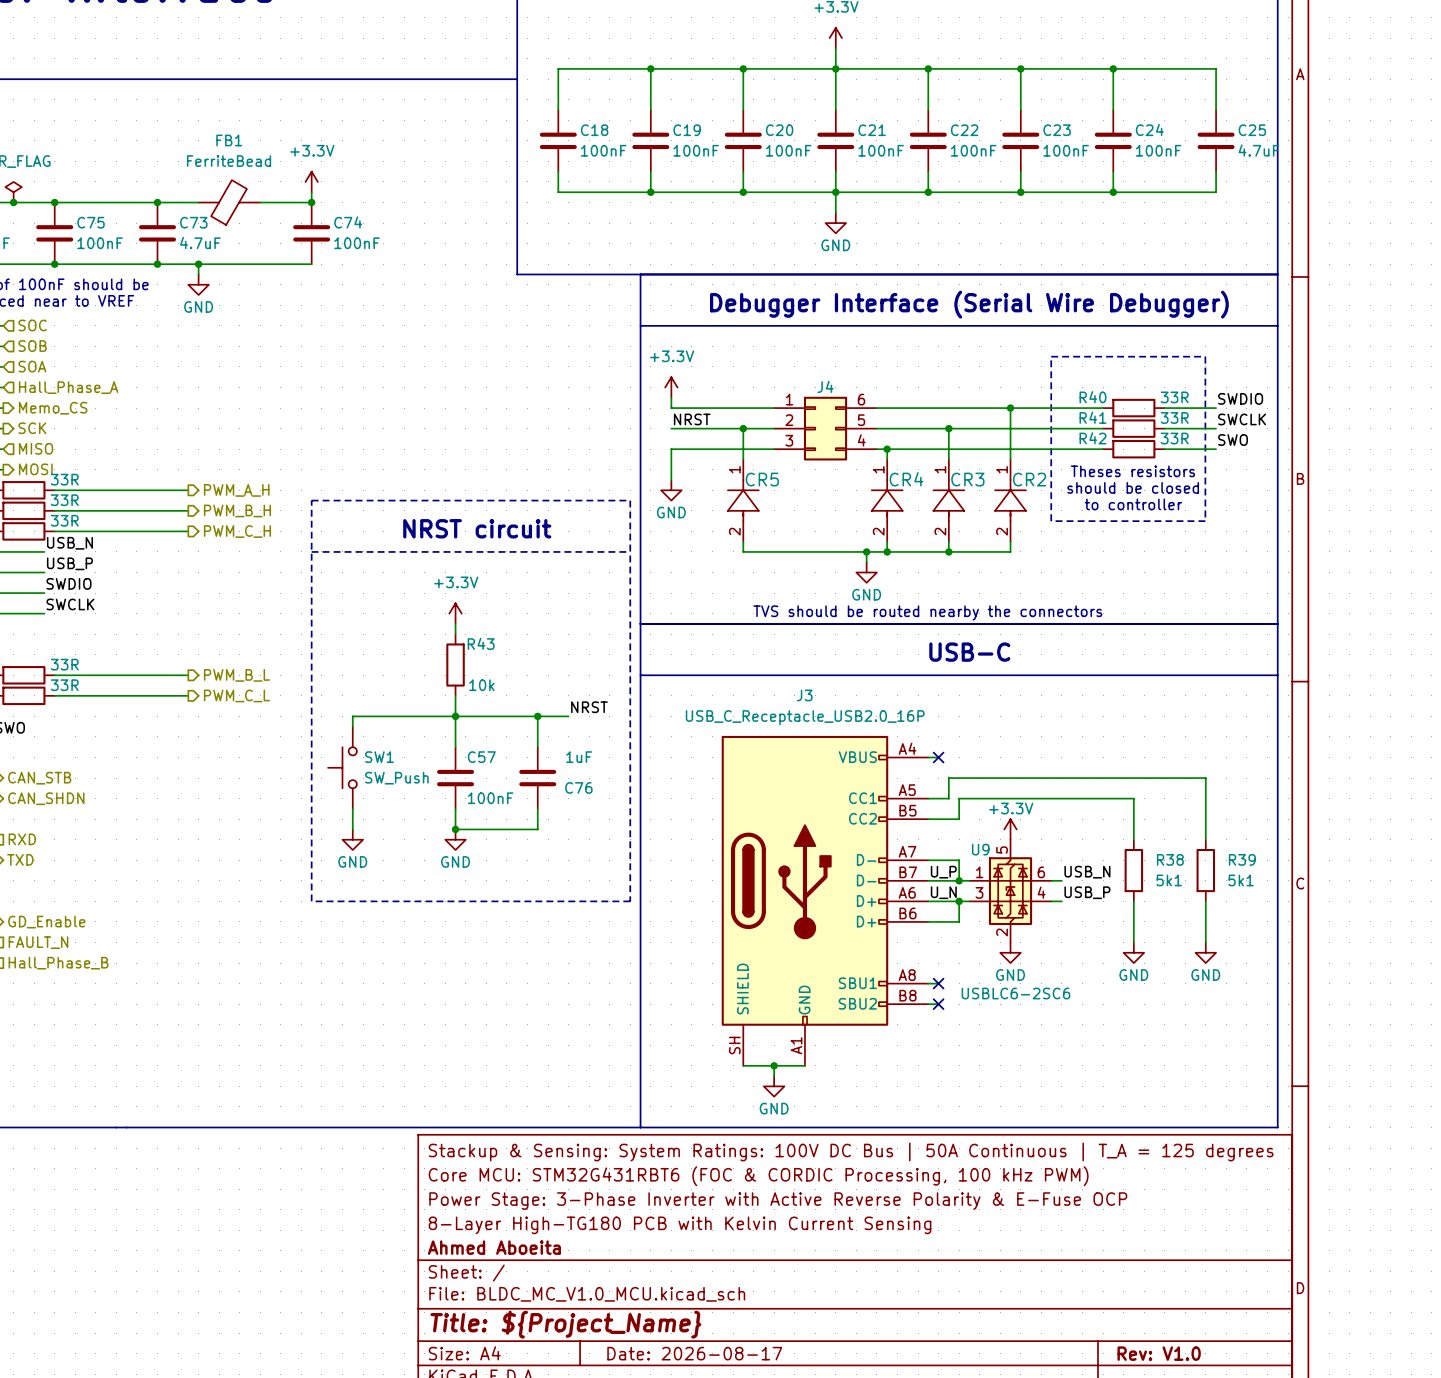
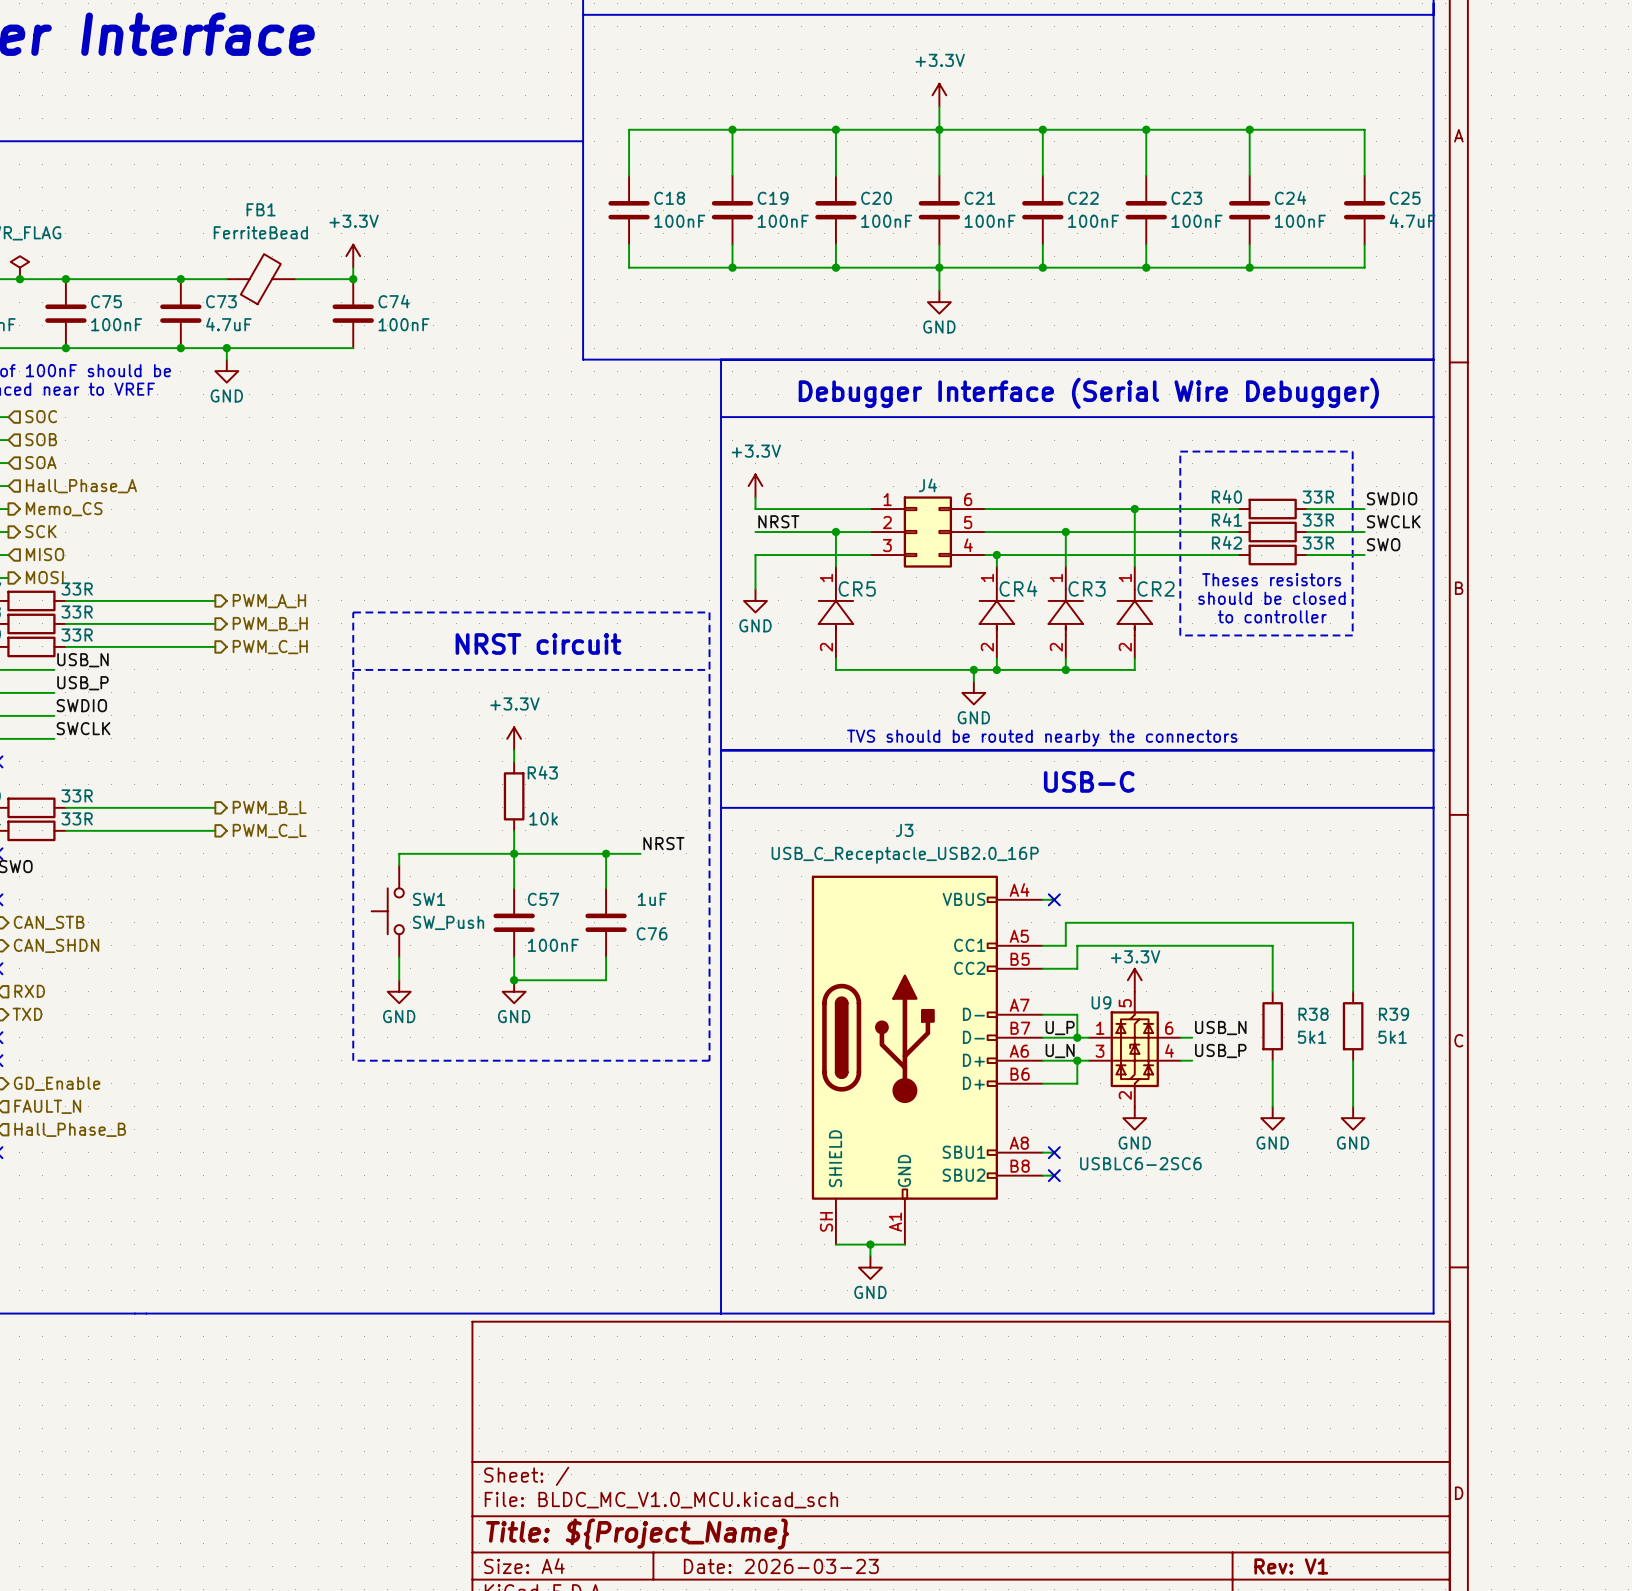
title block: Stackup & Sensing: System Ratings: 100V DC Bus | 50A Continuous | T_A = 125 degrees (851, 1151) -> none
title block: Core MCU: STM32G431RBT6 (FOC & CORDIC Processing, 100 kHz PWM) (758, 1176) -> none
title block: Power Stage: 3-Phase Inverter with Active Reverse Polarity & E-Fuse OCP (778, 1201) -> none
title block: 8-Layer High-TG180 PCB with Kelvin Current Sensing (680, 1225) -> none
title block: Ahmed Aboeita (494, 1247) -> none
title block: Date: 2026-08-17 (694, 1353) -> Date: 2026-03-23 (781, 1566)
title block: Rev: V1.0 (1159, 1353) -> Rev: V1 (1291, 1566)

